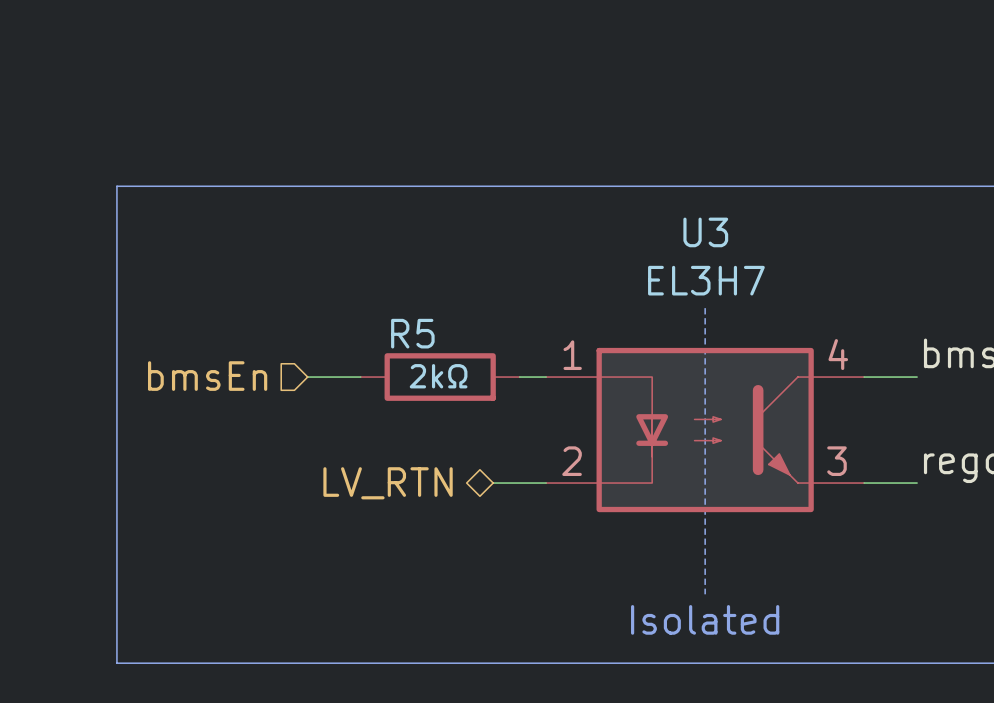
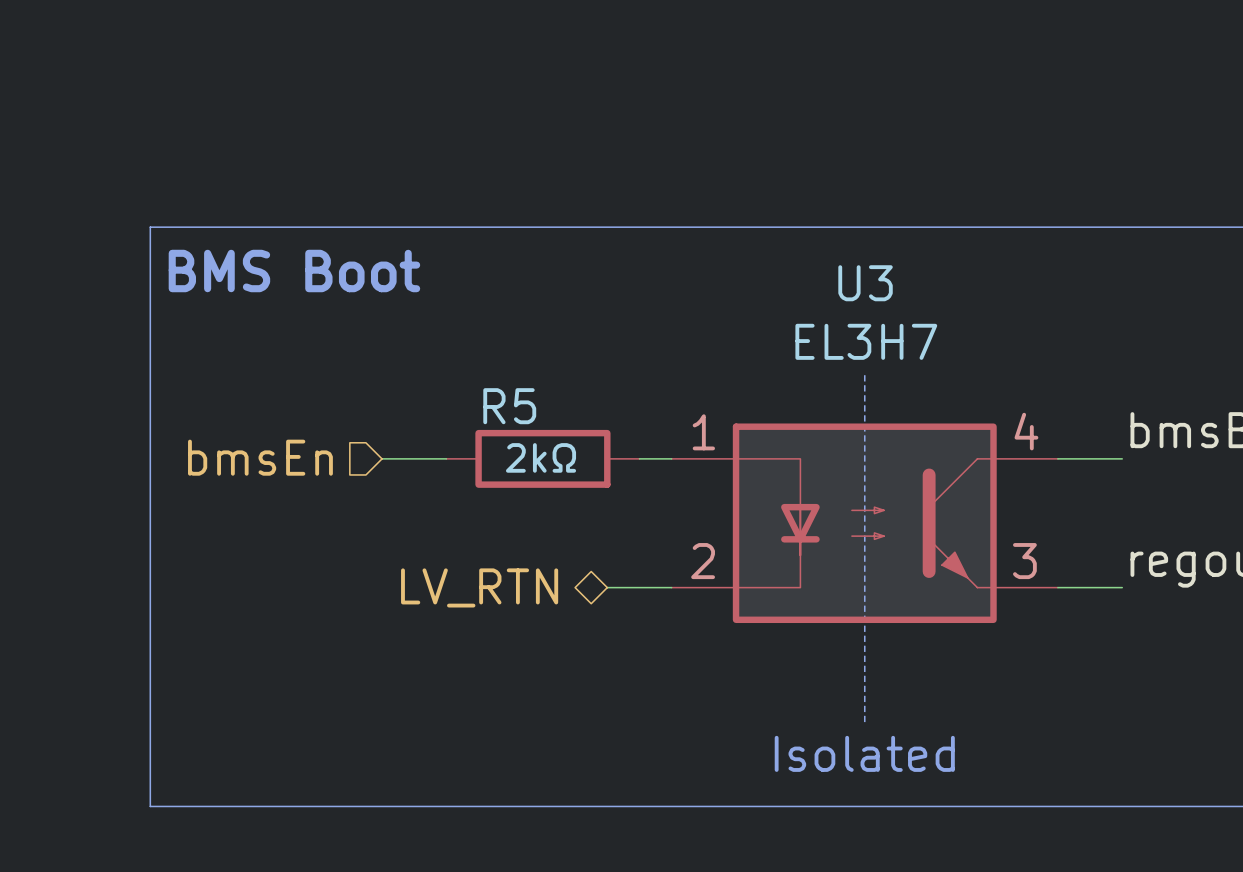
text: none -> BMS Boot (294, 271)

